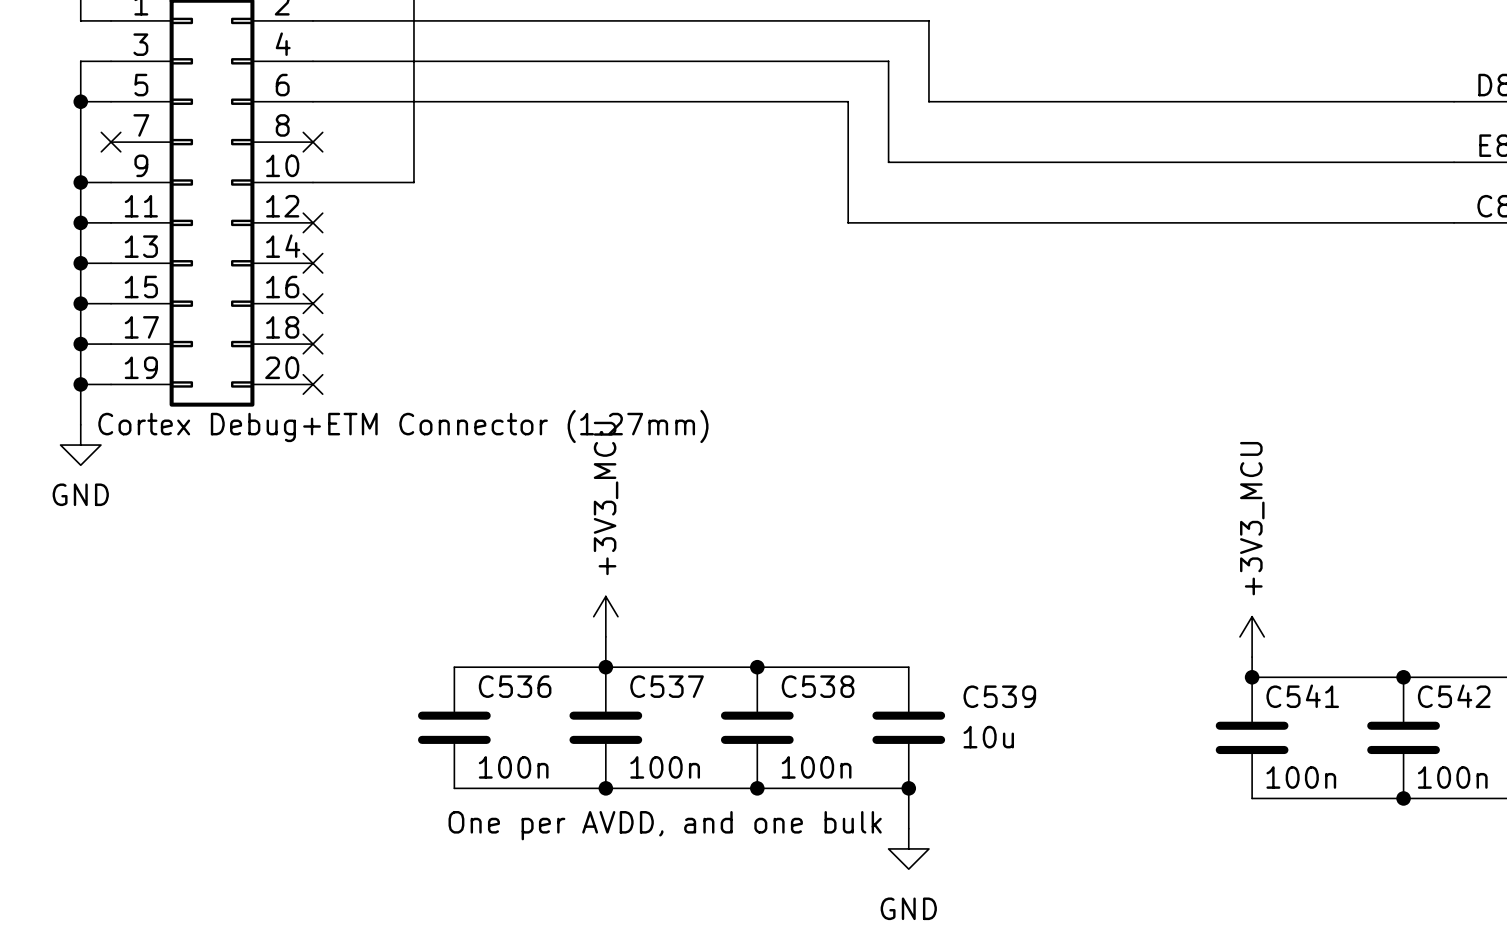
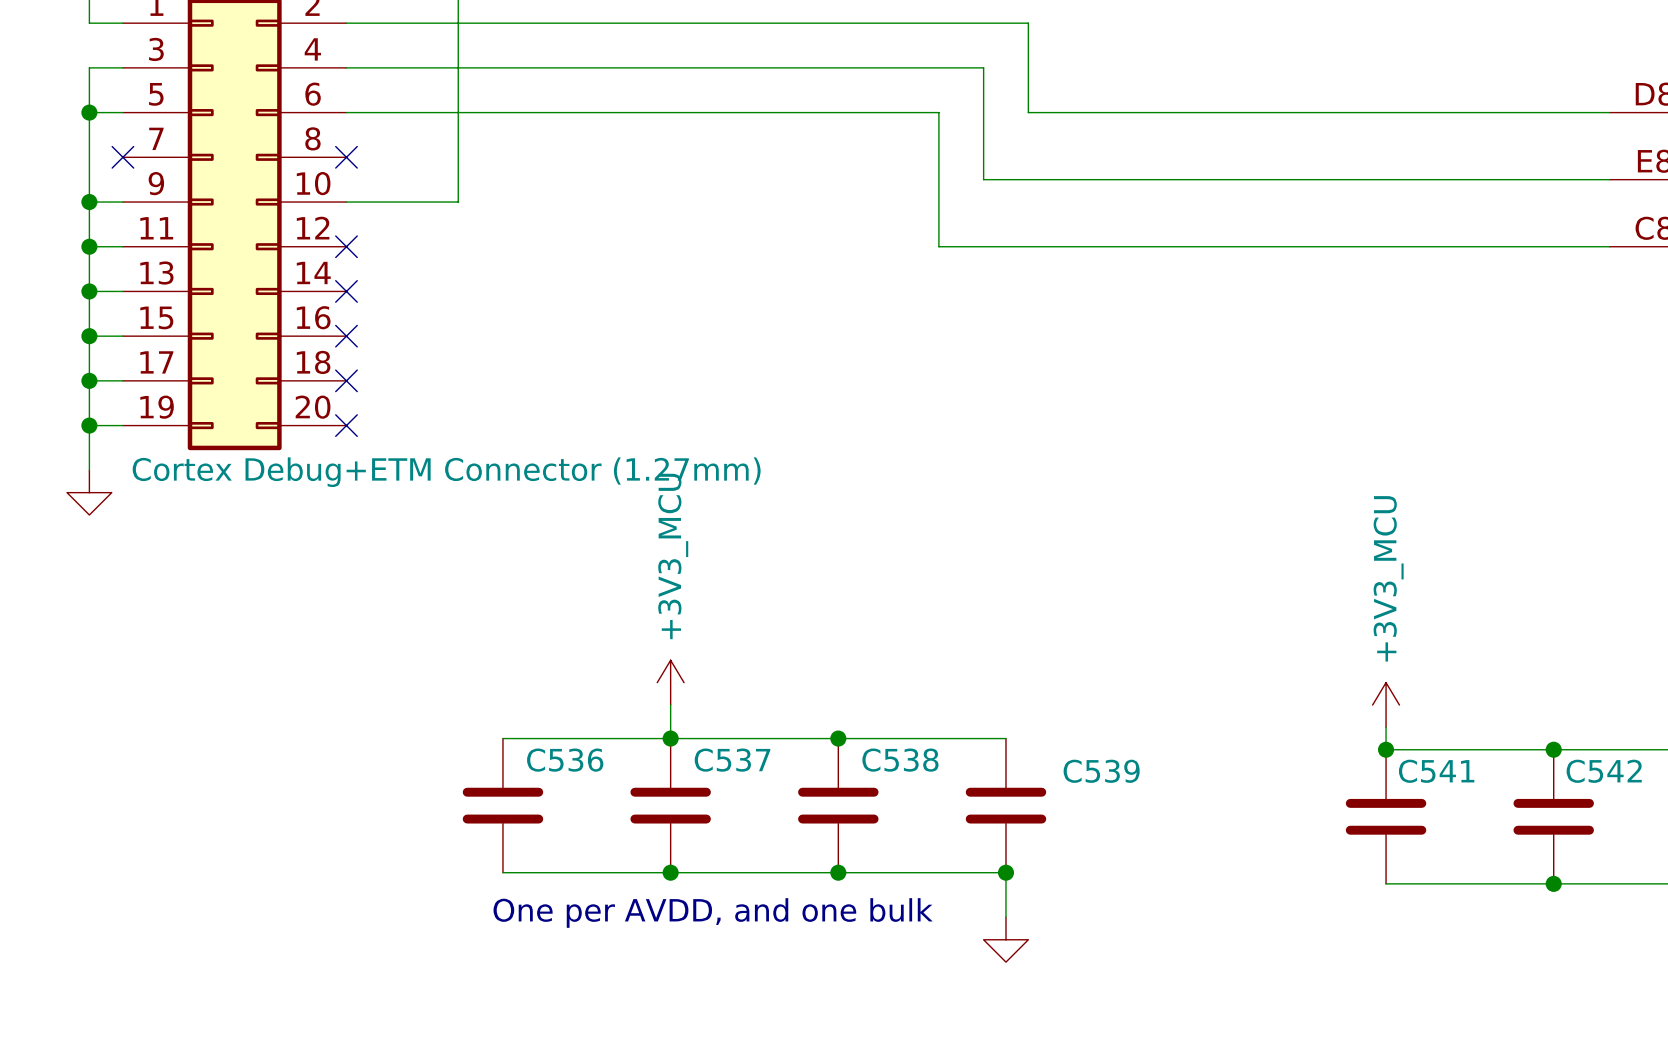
power symbol text: GND (80, 494) -> none
C539 value: 10u (988, 737) -> none
C536 value: 100n (513, 767) -> none
C537 value: 100n (665, 767) -> none
C538 value: 100n (816, 767) -> none
C541 value: 100n (1301, 777) -> none
C542 value: 100n (1452, 777) -> none
power symbol text: GND (908, 908) -> none

